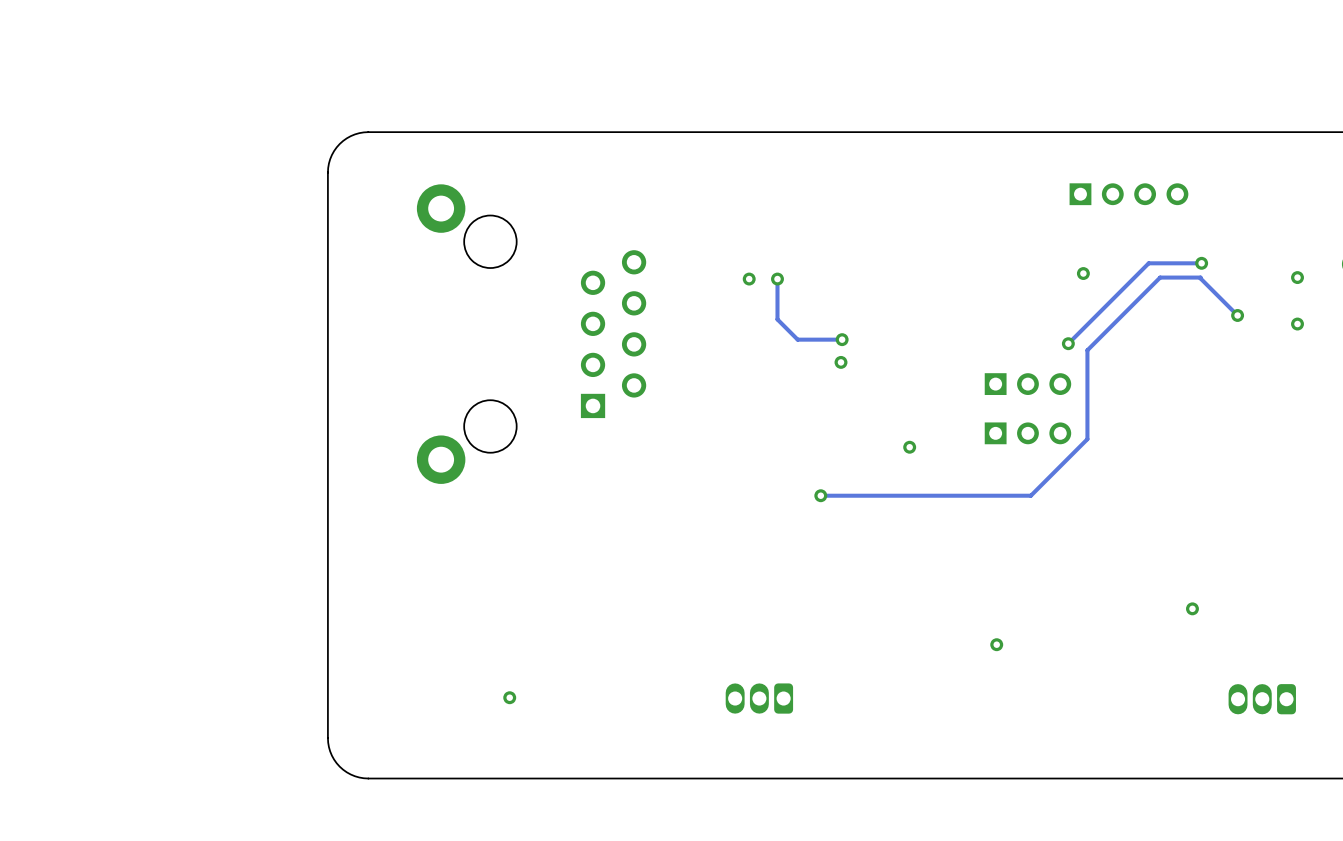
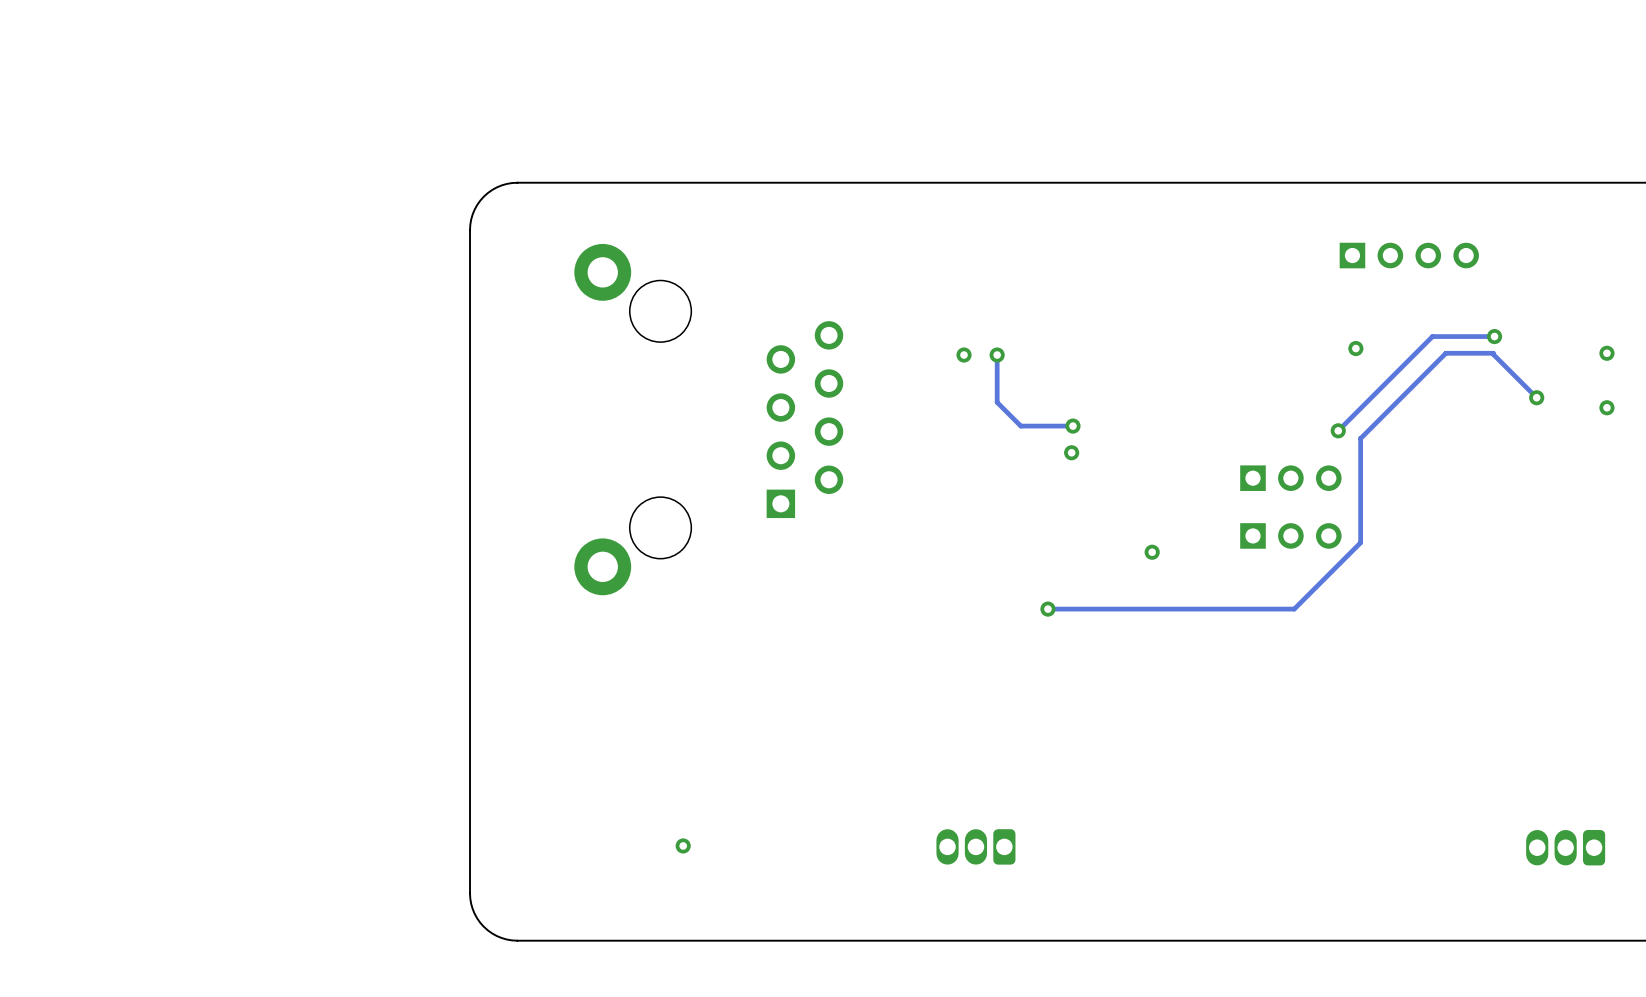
via: (1192, 608) -> none
via: (996, 644) -> none

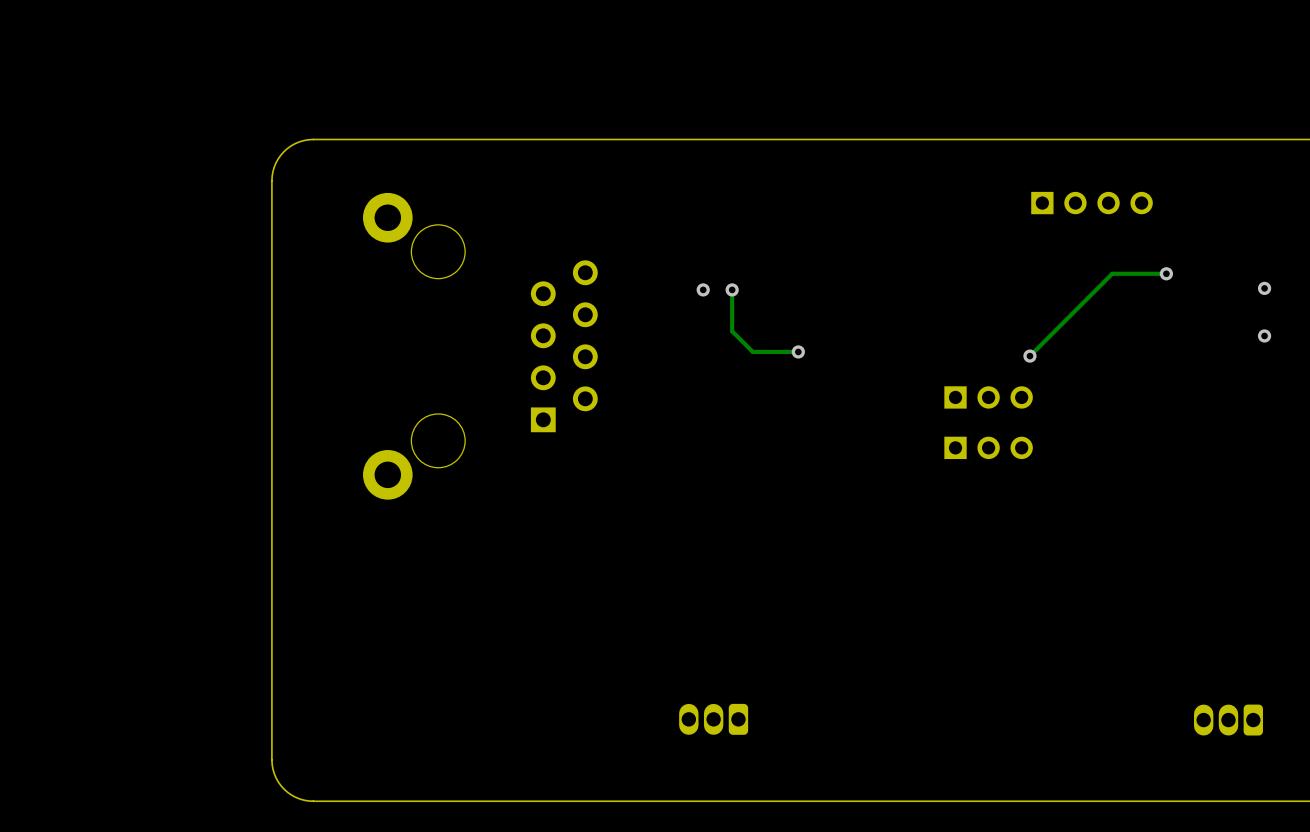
via: (1355, 348) -> none
track: (1536, 397) (1493, 353) (1445, 353) (1360, 438) (1360, 542) (1294, 609) (1047, 609) -> none
via: (1536, 397) -> none
via: (1071, 452) -> none
via: (1152, 552) -> none
via: (1047, 609) -> none
via: (683, 845) -> none

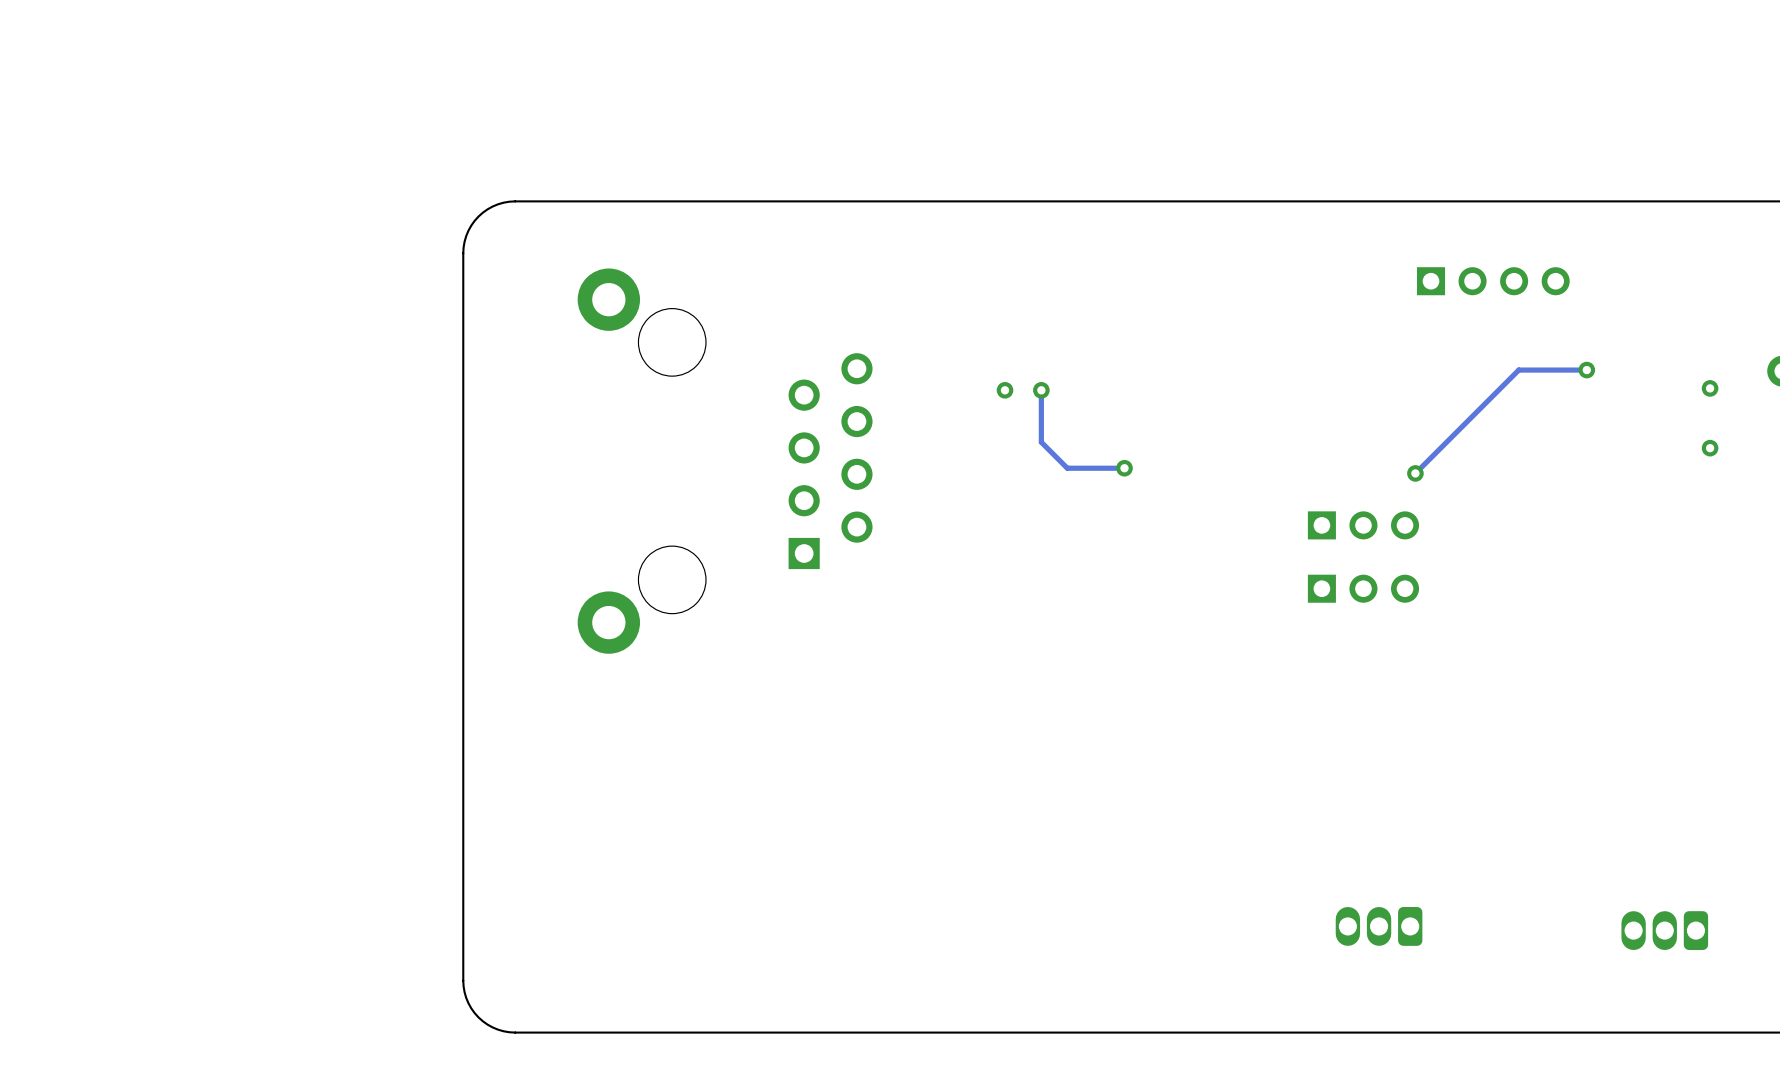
part position: (713, 719) -> (1379, 926)

